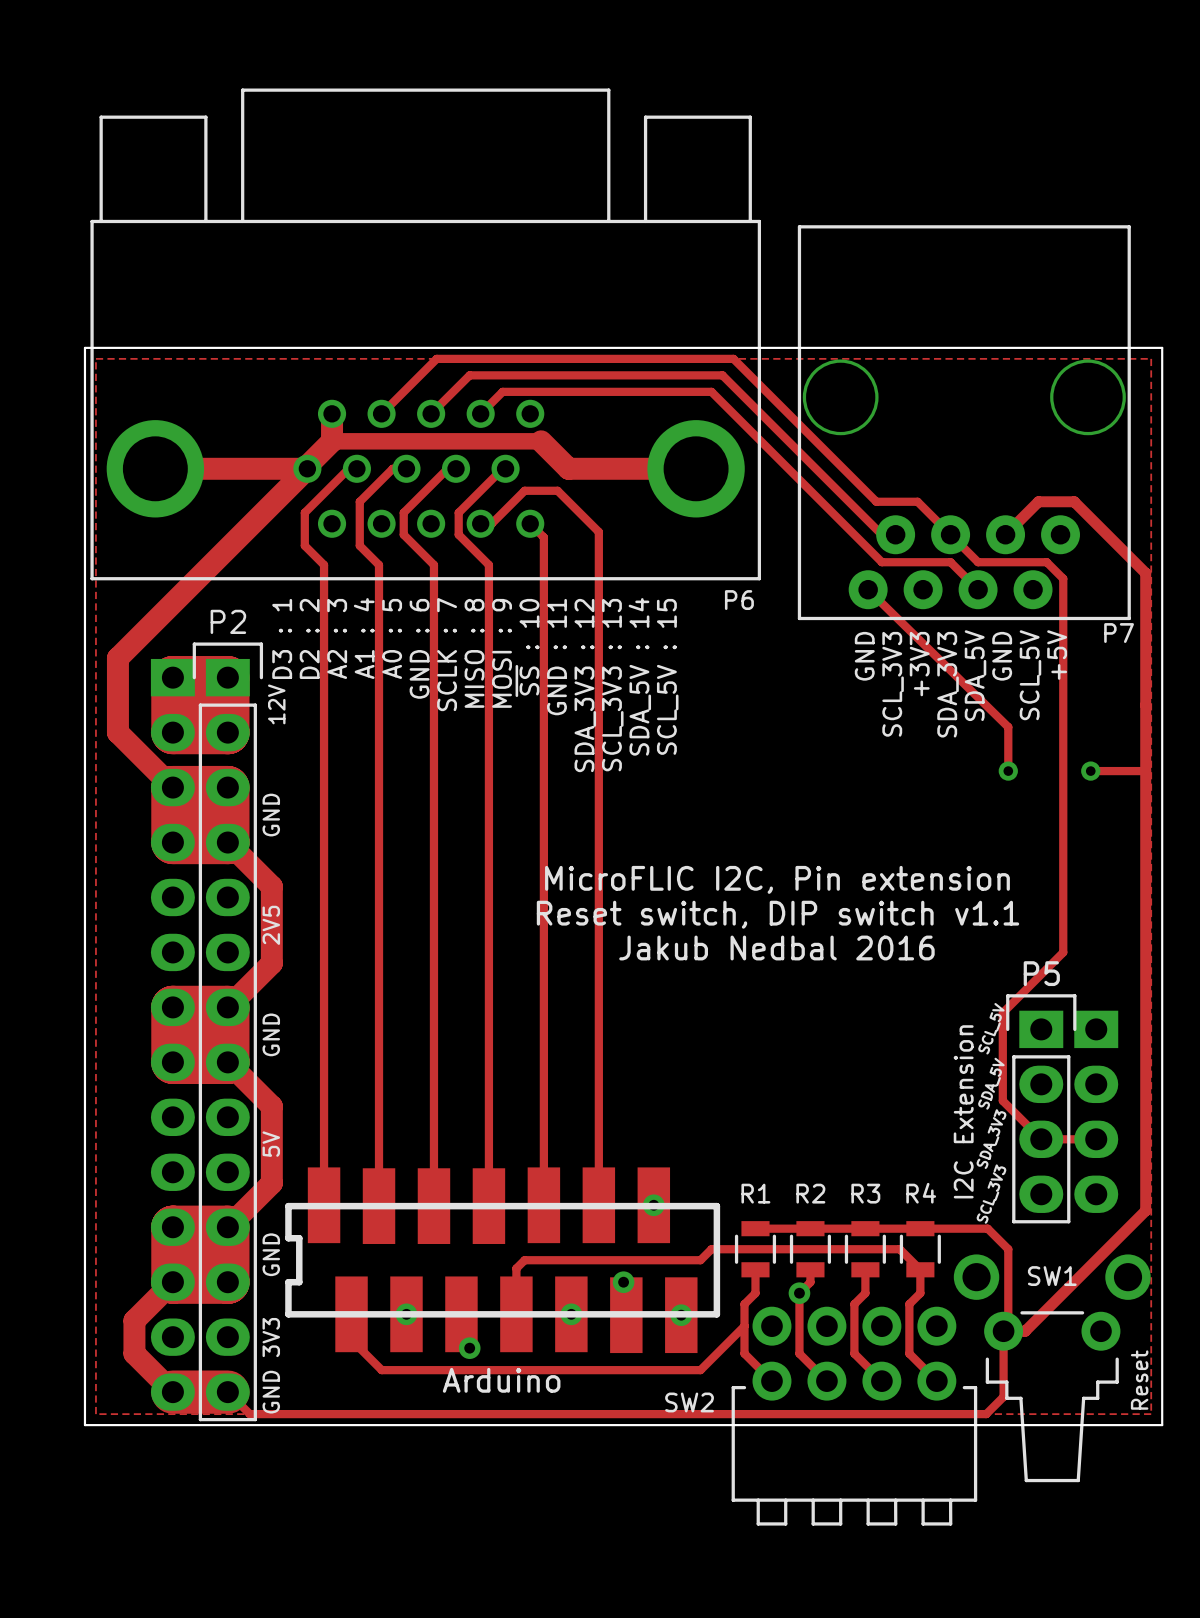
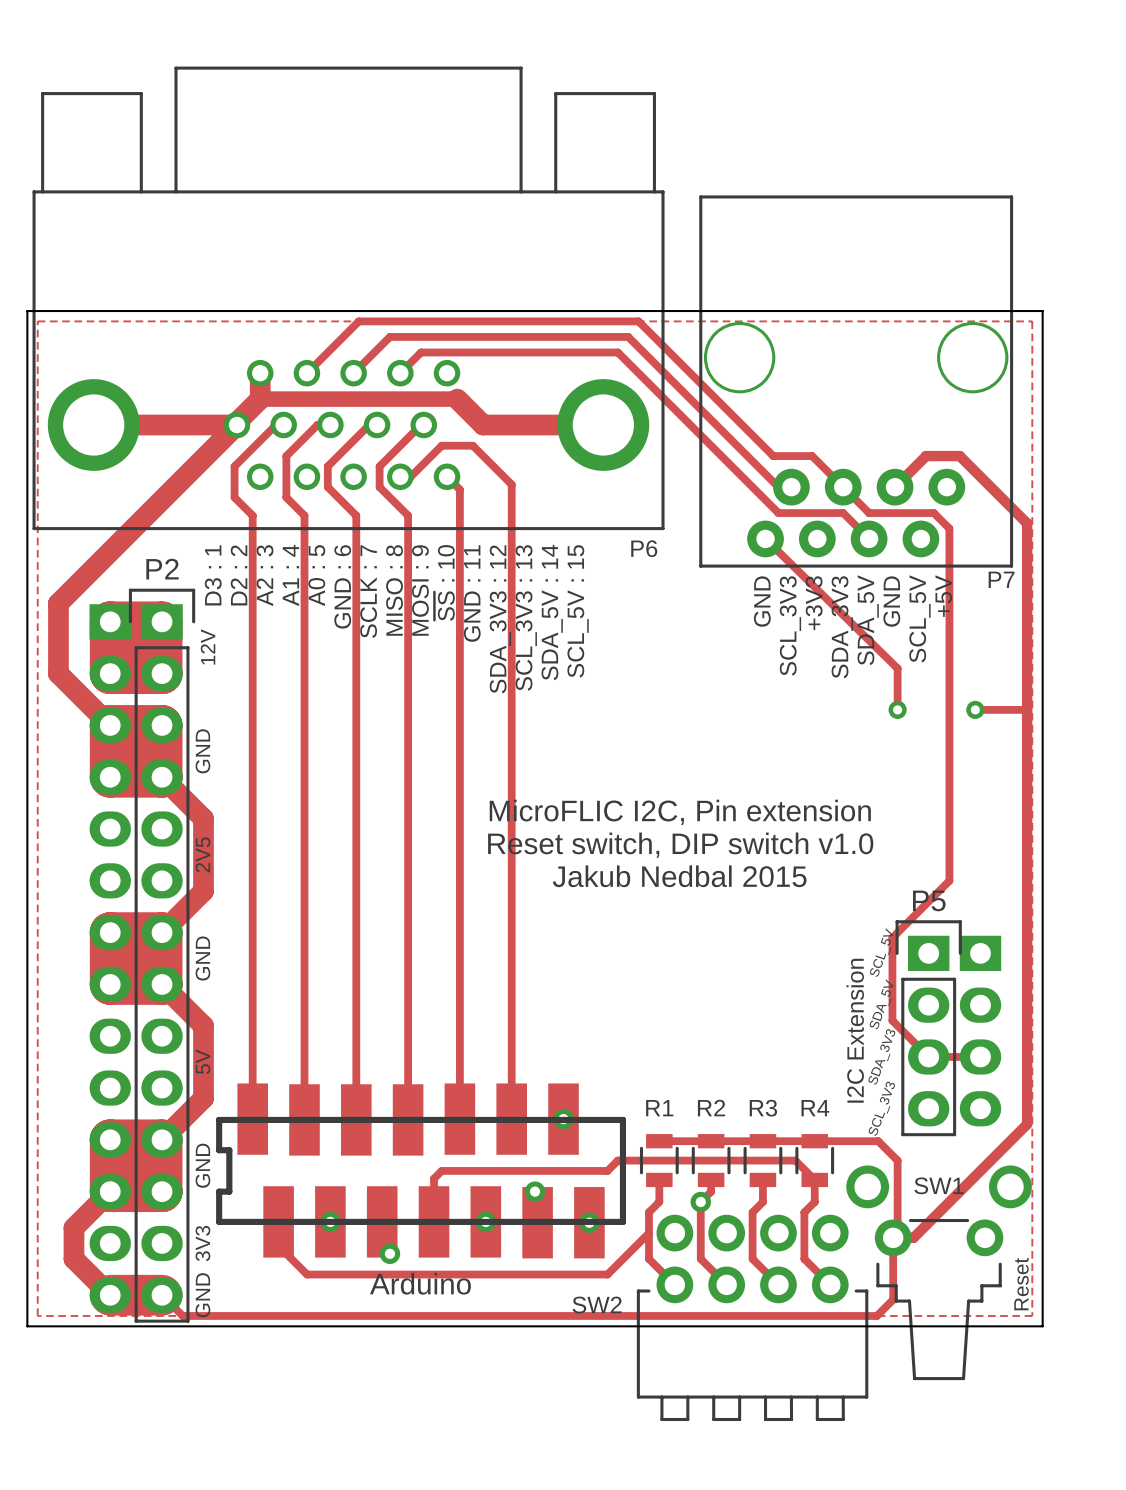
text: Reset switch, DIP switch v1.1 (777, 914) -> Reset switch, DIP switch v1.0 (680, 845)
text: Jakub Nedbal 2016 (776, 948) -> Jakub Nedbal 2015 (679, 876)

